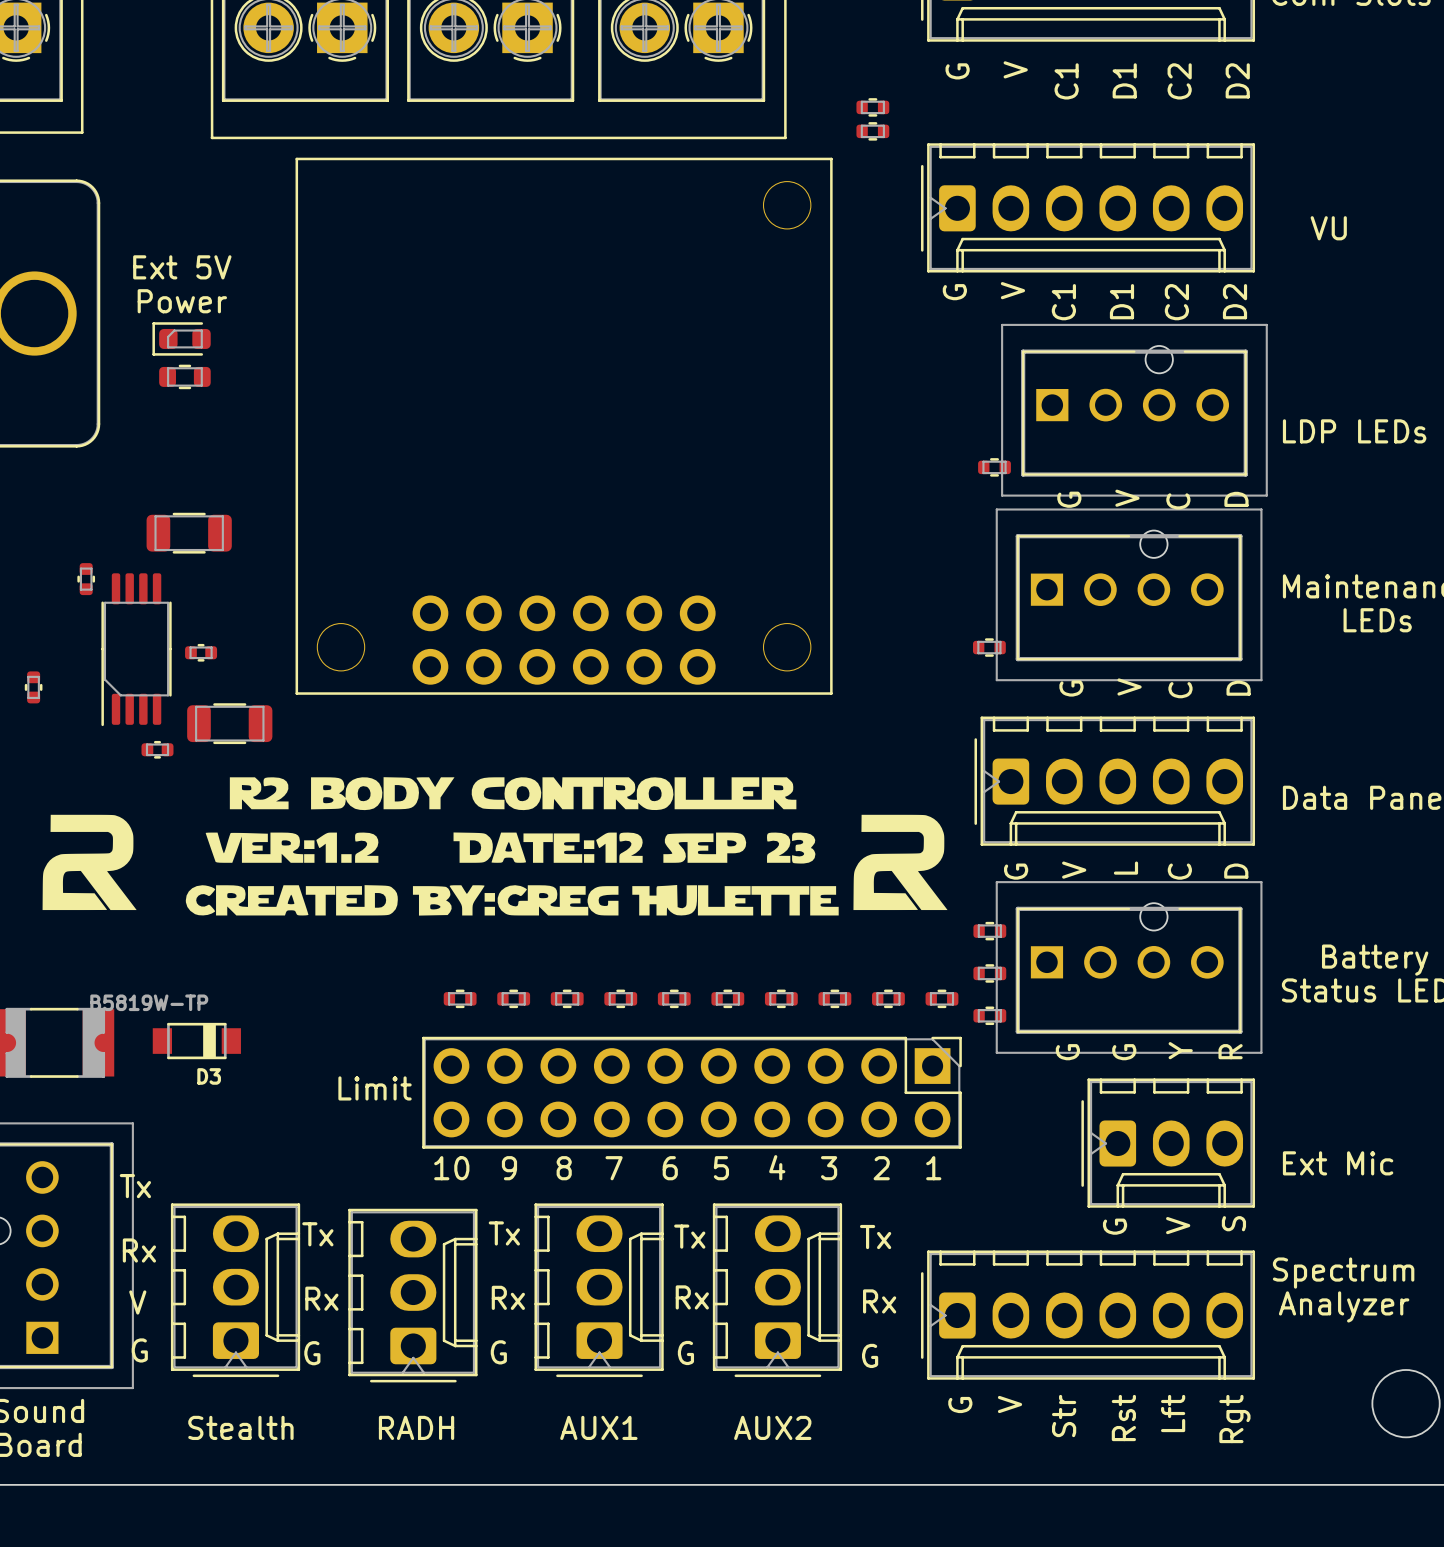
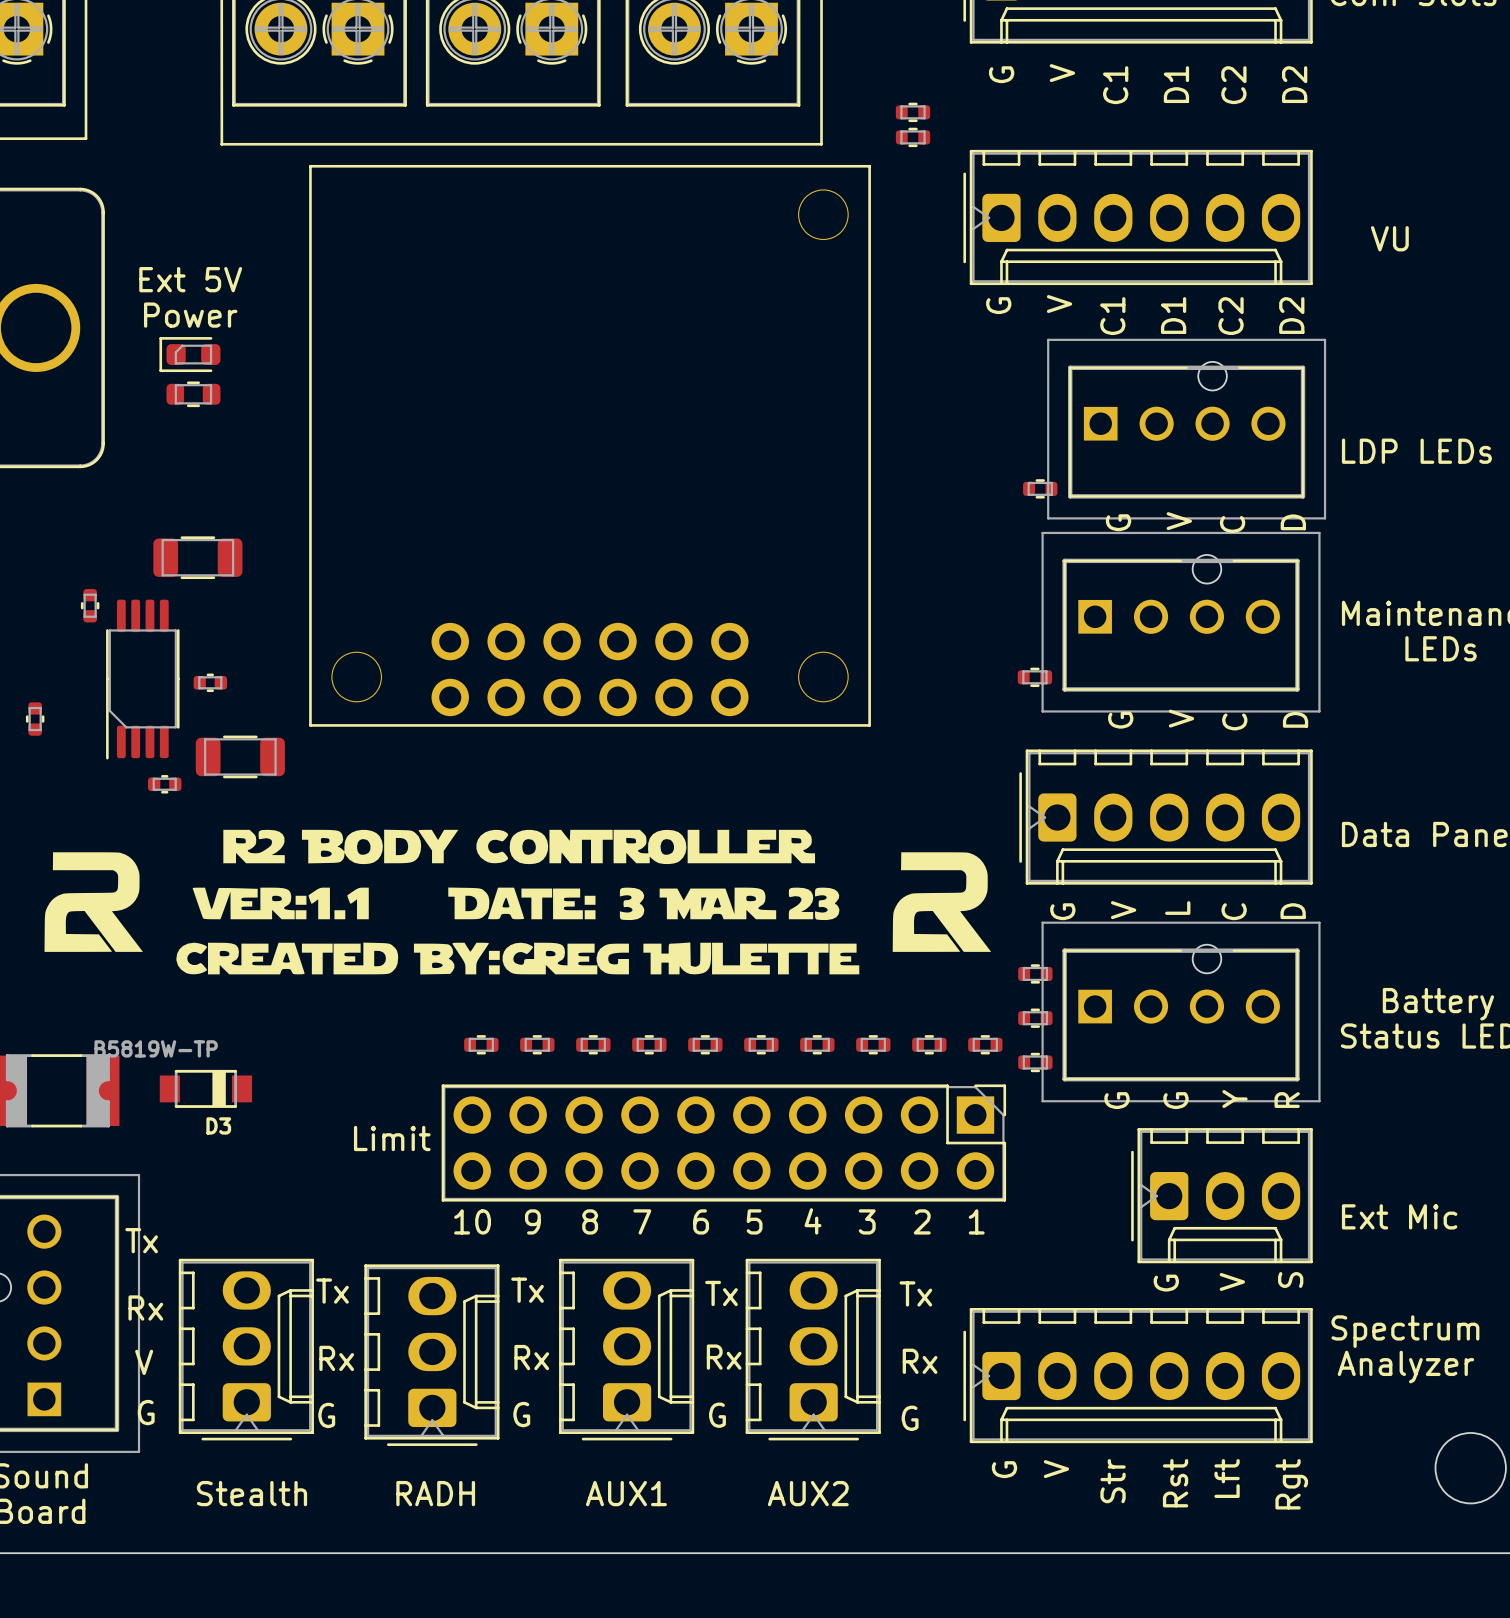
drawing: [185, 777, 839, 916] -> none
drawing: none -> [176, 829, 860, 975]

